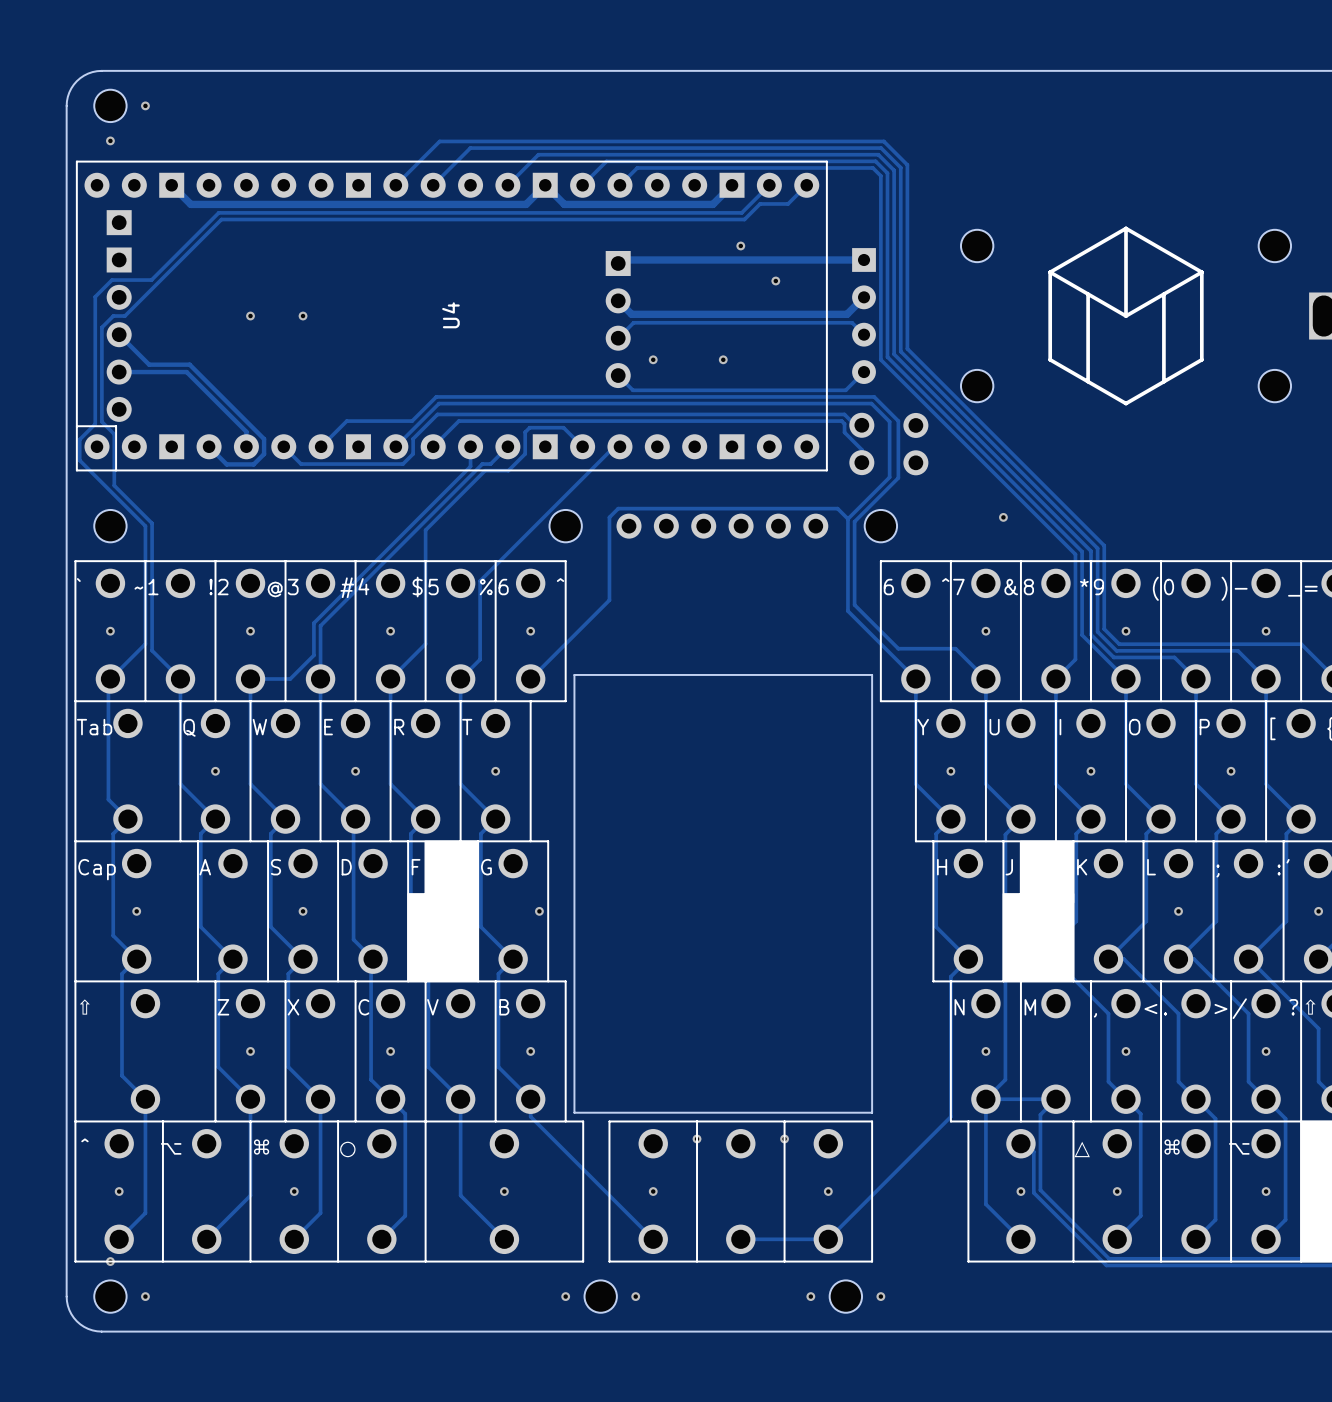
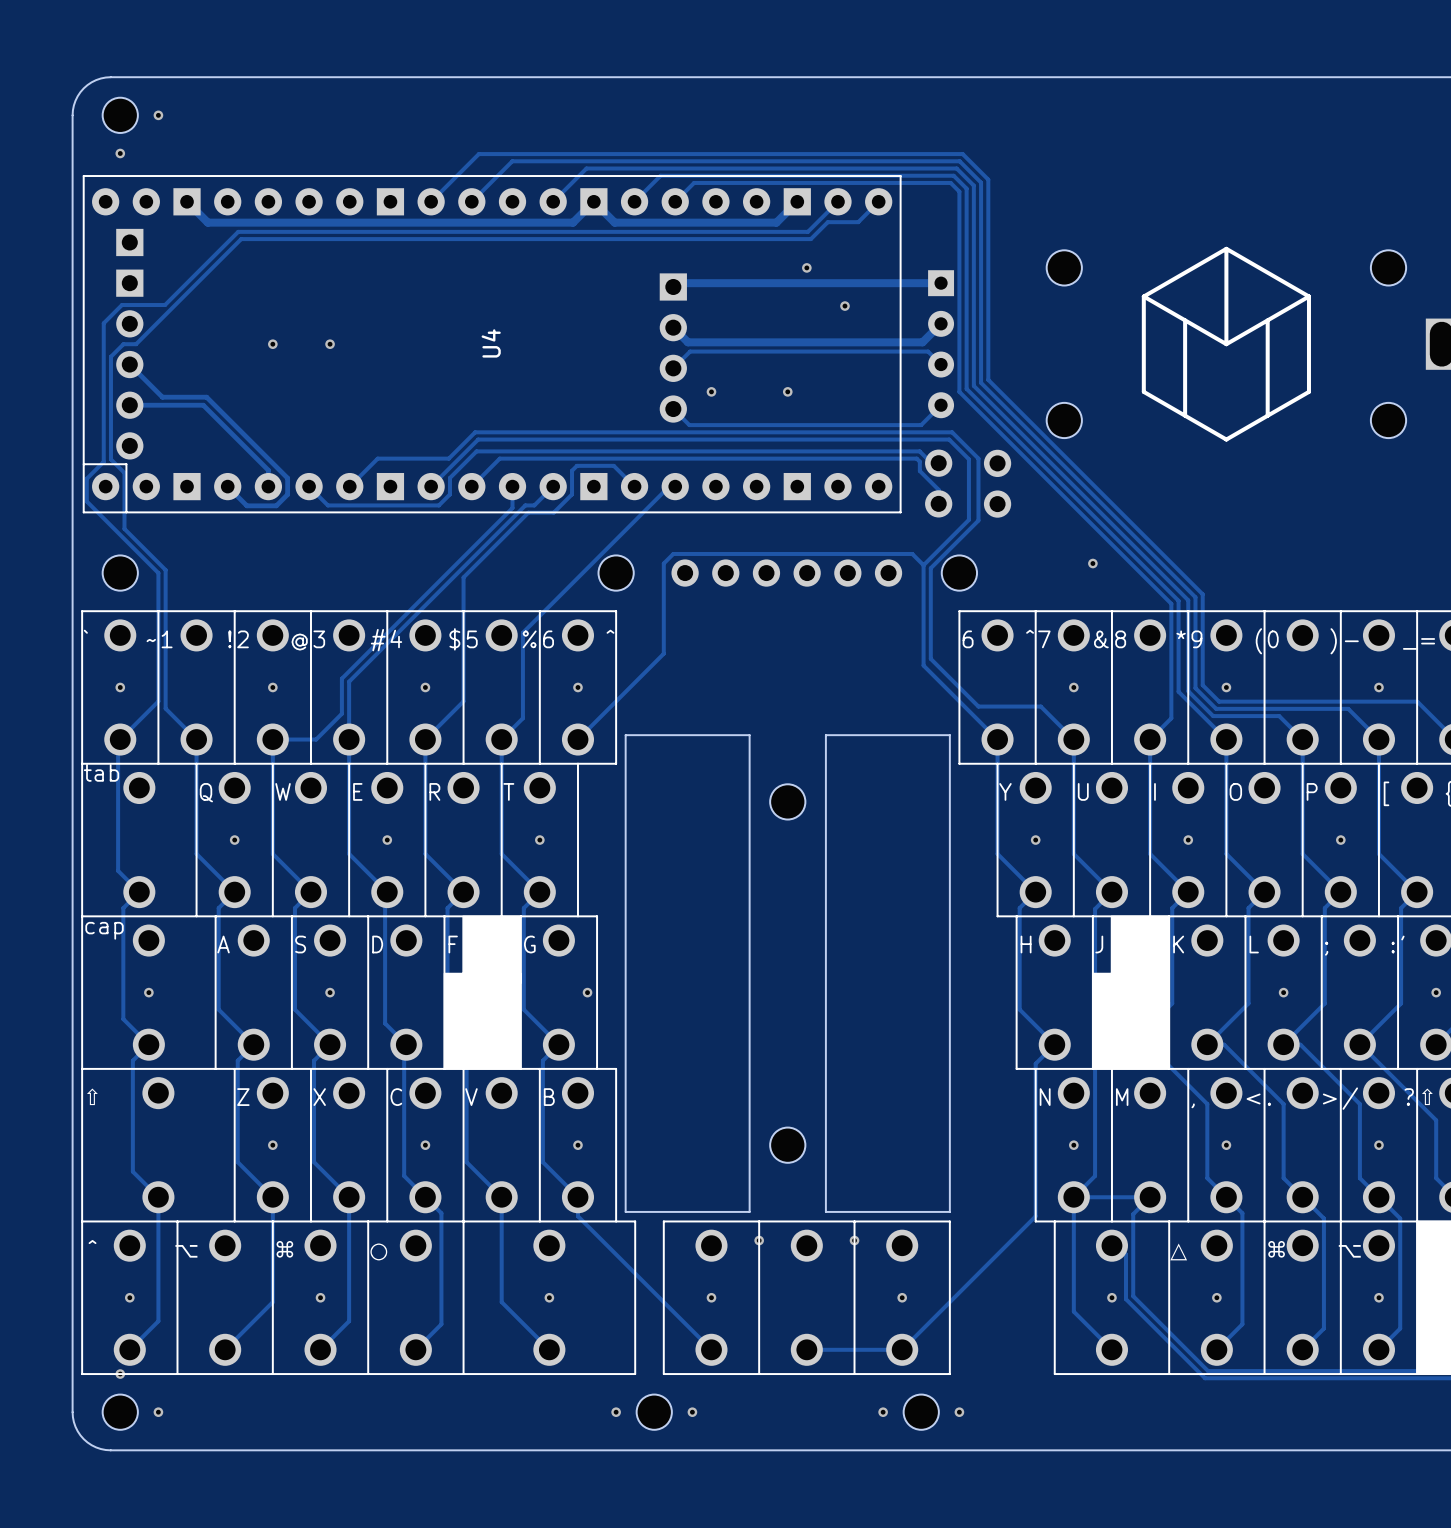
board edge: (688, 674) (758, 674) -> (749, 735) (749, 1211)
text: Tab (94, 727) -> tab (101, 772)
part: none -> (787, 801)
text: Cap (97, 869) -> cap (104, 930)
part: none -> (787, 1145)
board edge: (688, 1112) (758, 1112) -> (825, 735) (825, 1211)

